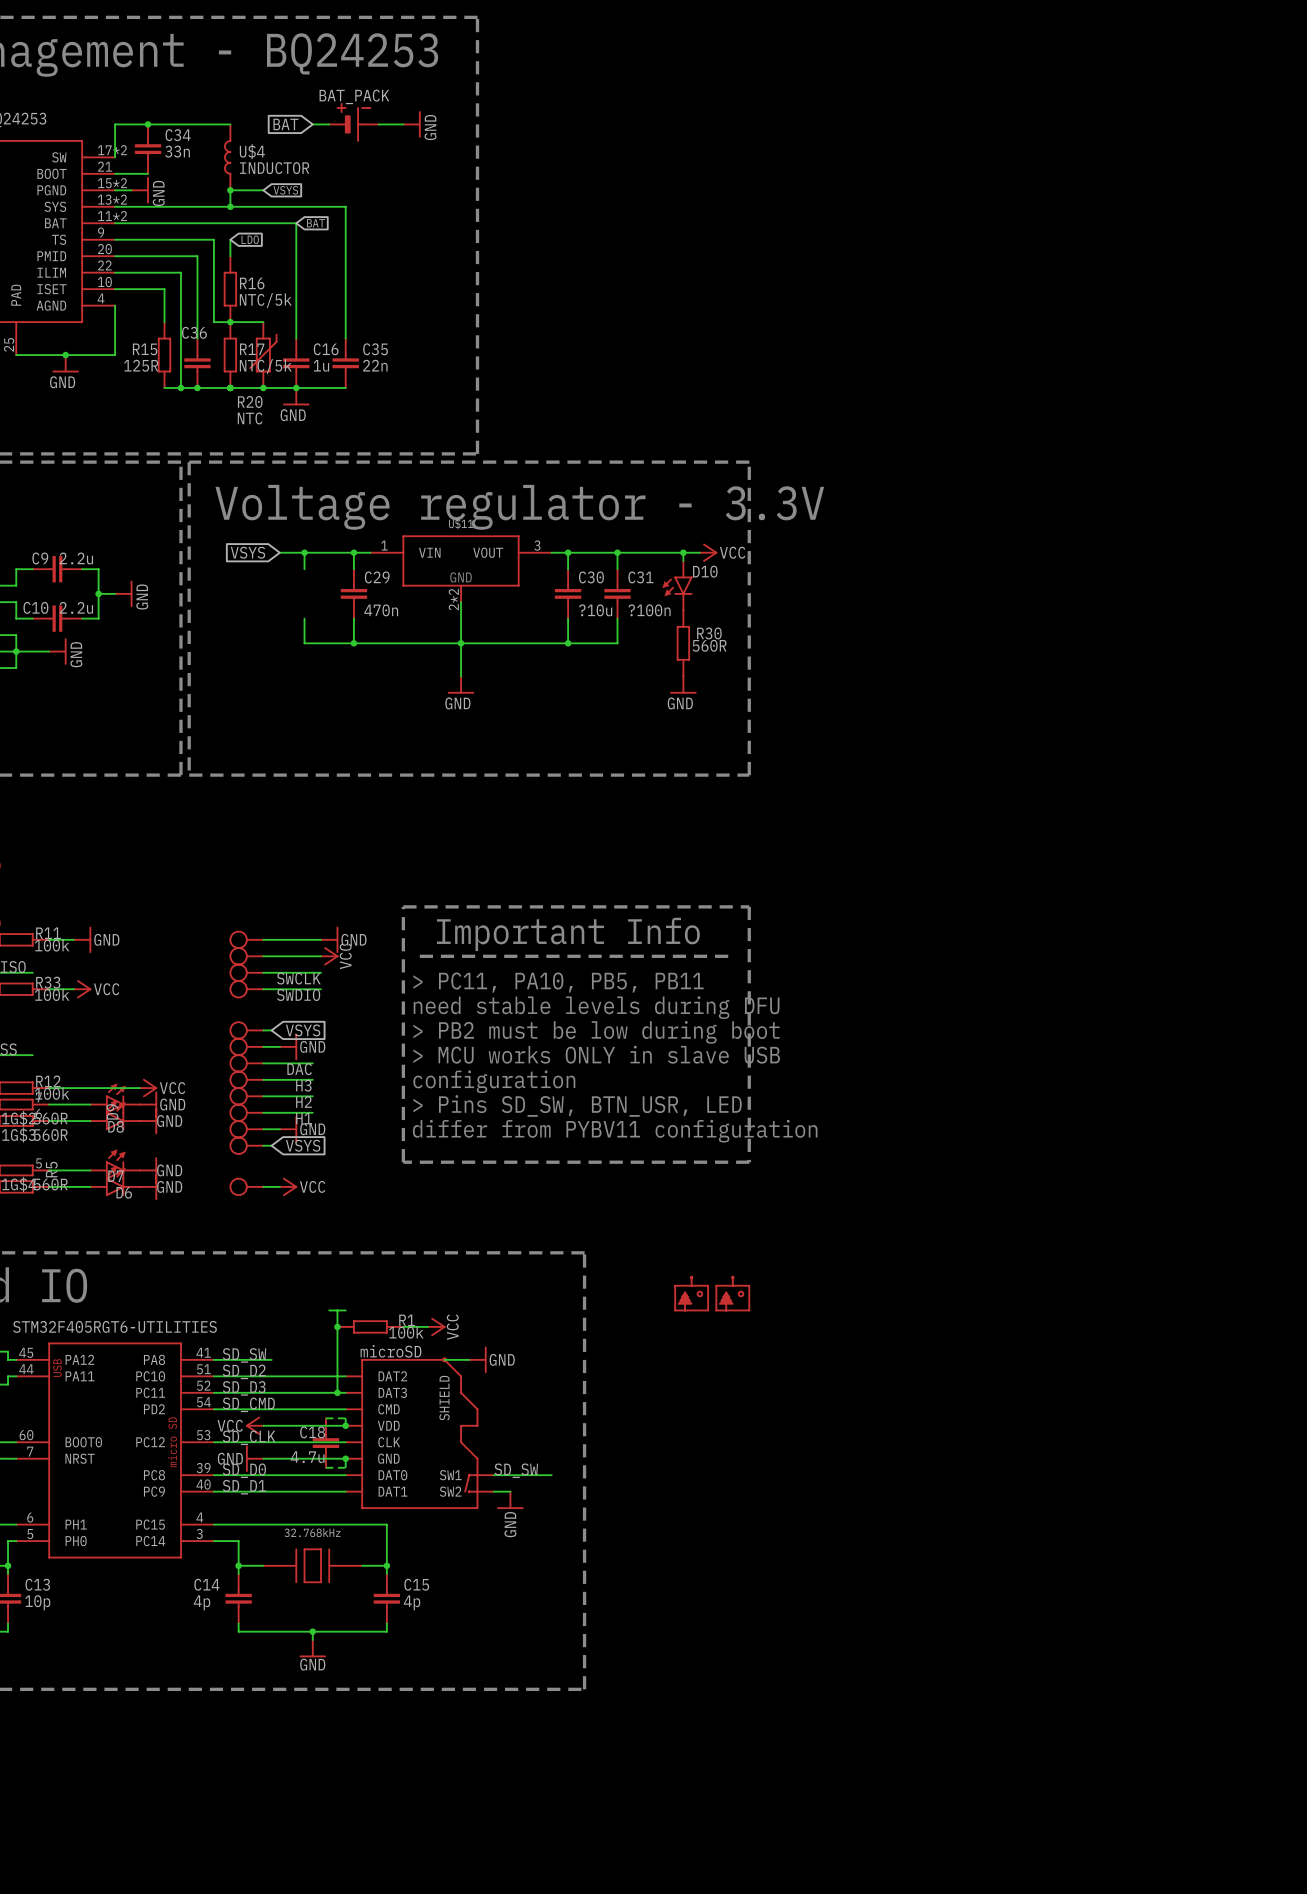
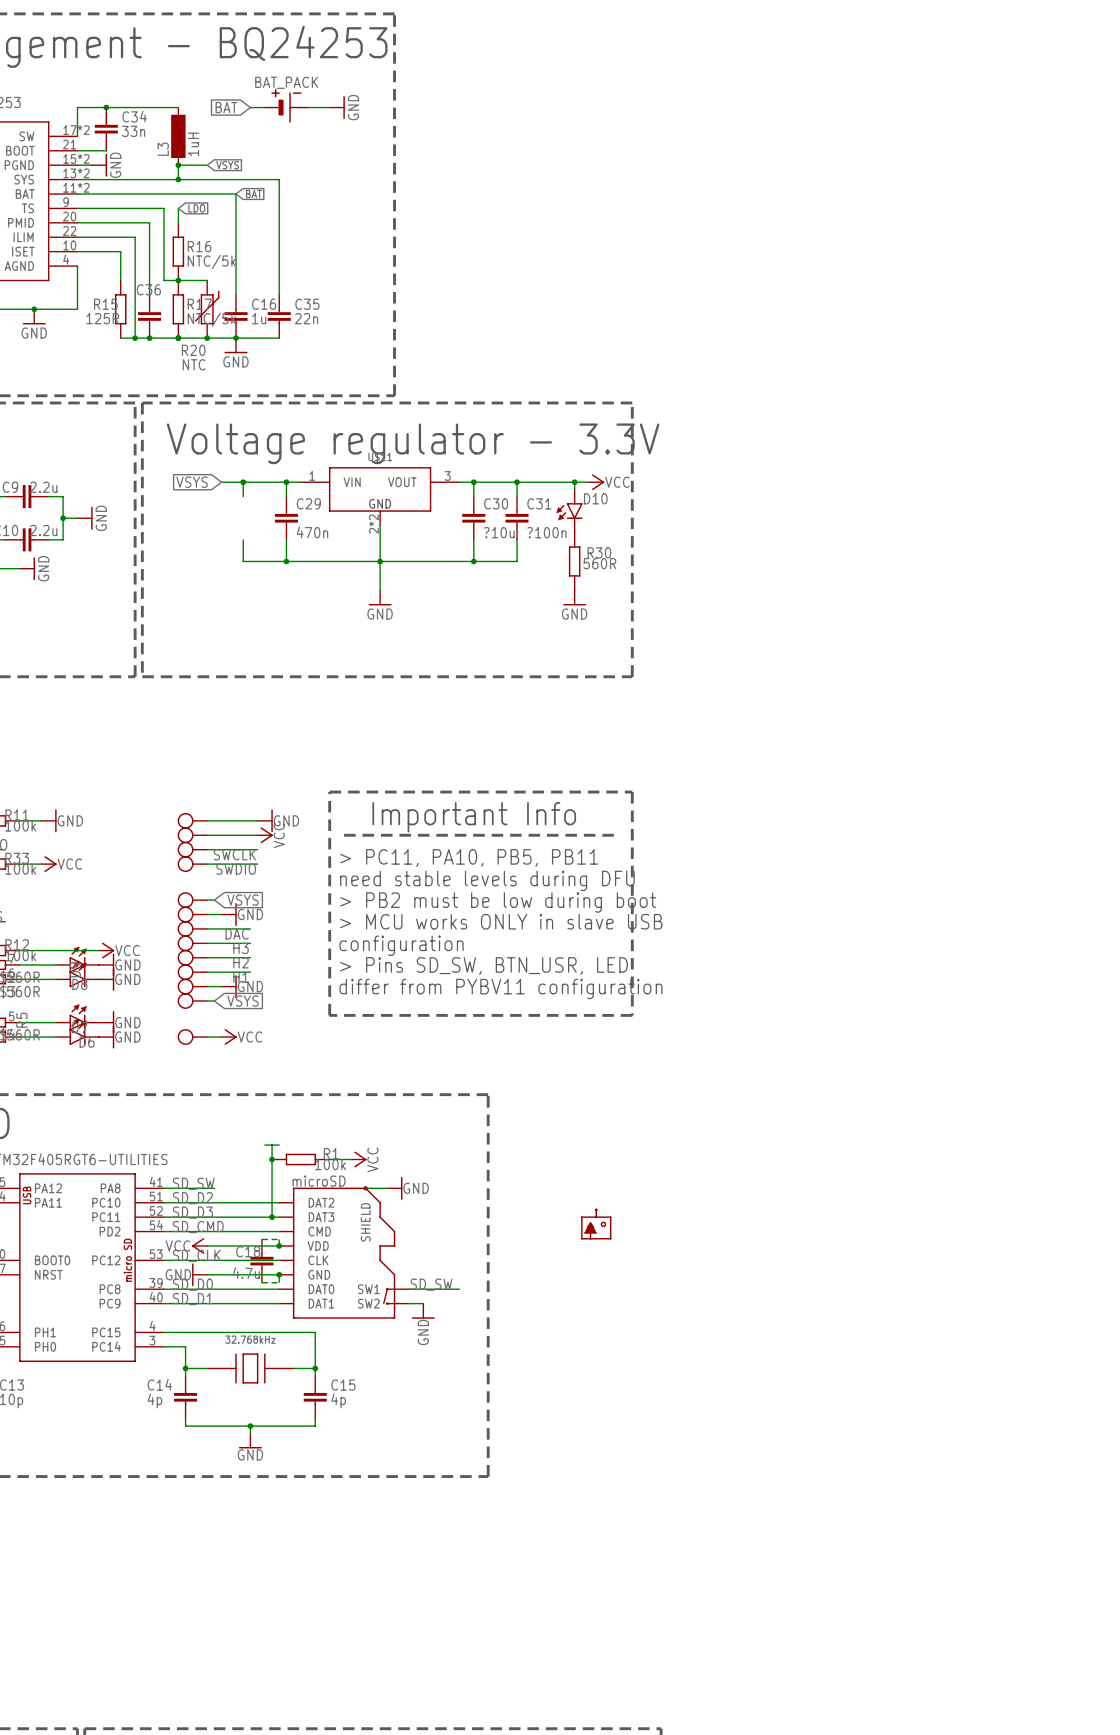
U$4: INDUCTOR (227, 157) -> none
L3: none -> 1uH (178, 136)
part: (691, 1293) -> none
part: (732, 1293) -> none
part: none -> (596, 1224)

